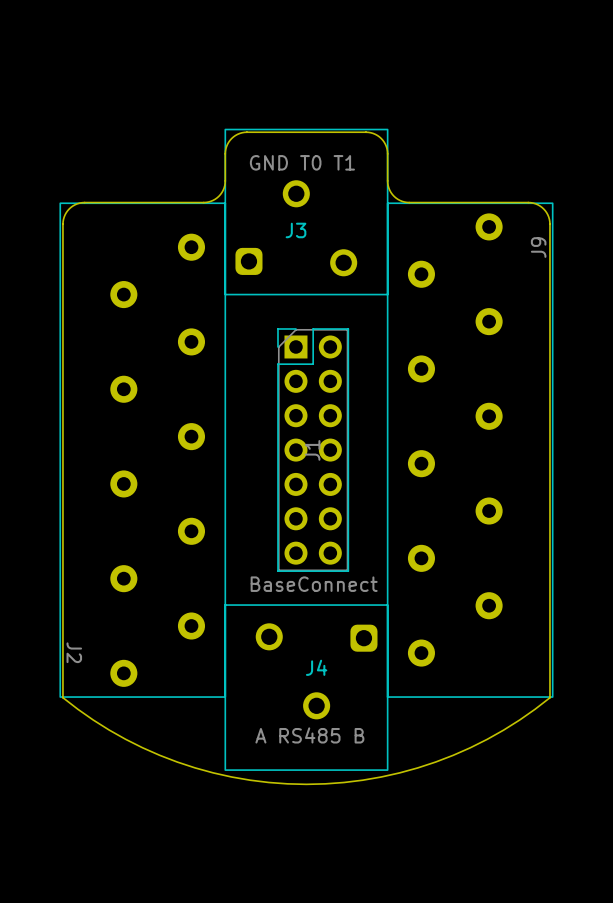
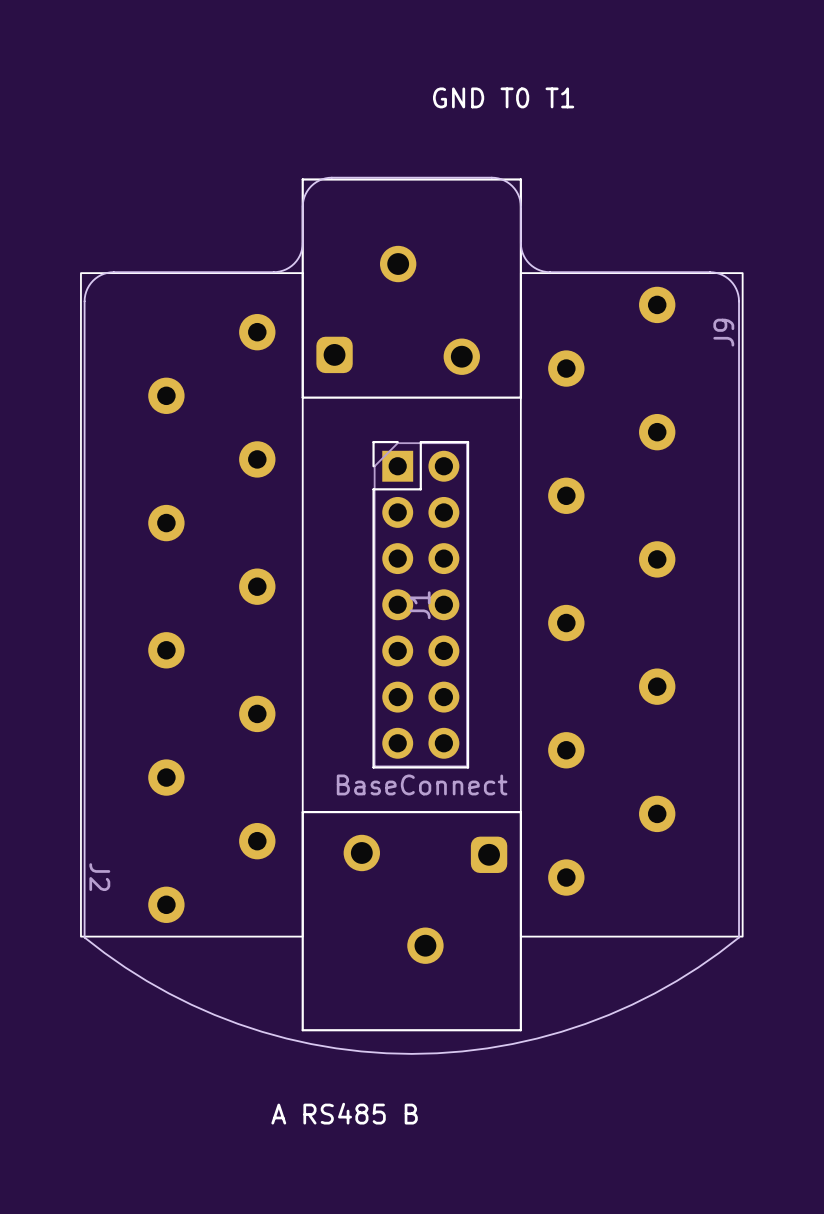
J3: GND T0 T1 (306, 212) -> none
part: none -> GND T0 T1 (411, 288)
part: none -> A RS485 B (411, 921)
J4: A RS485 B (306, 687) -> none

